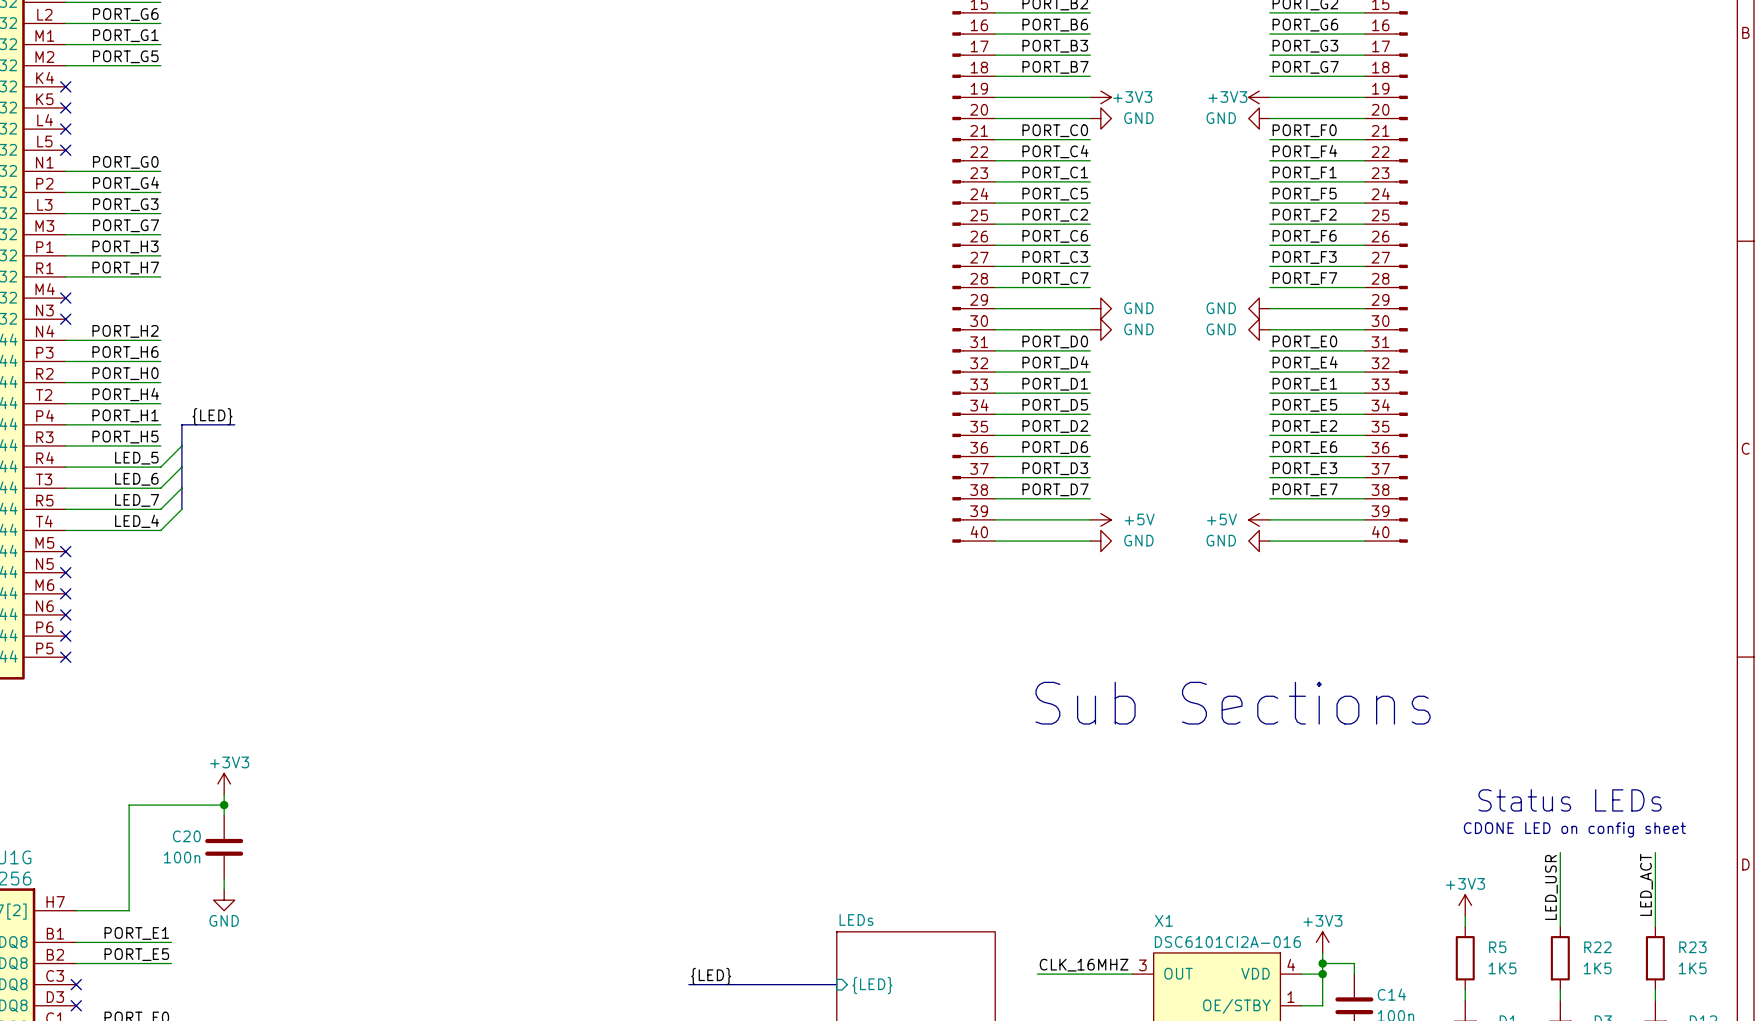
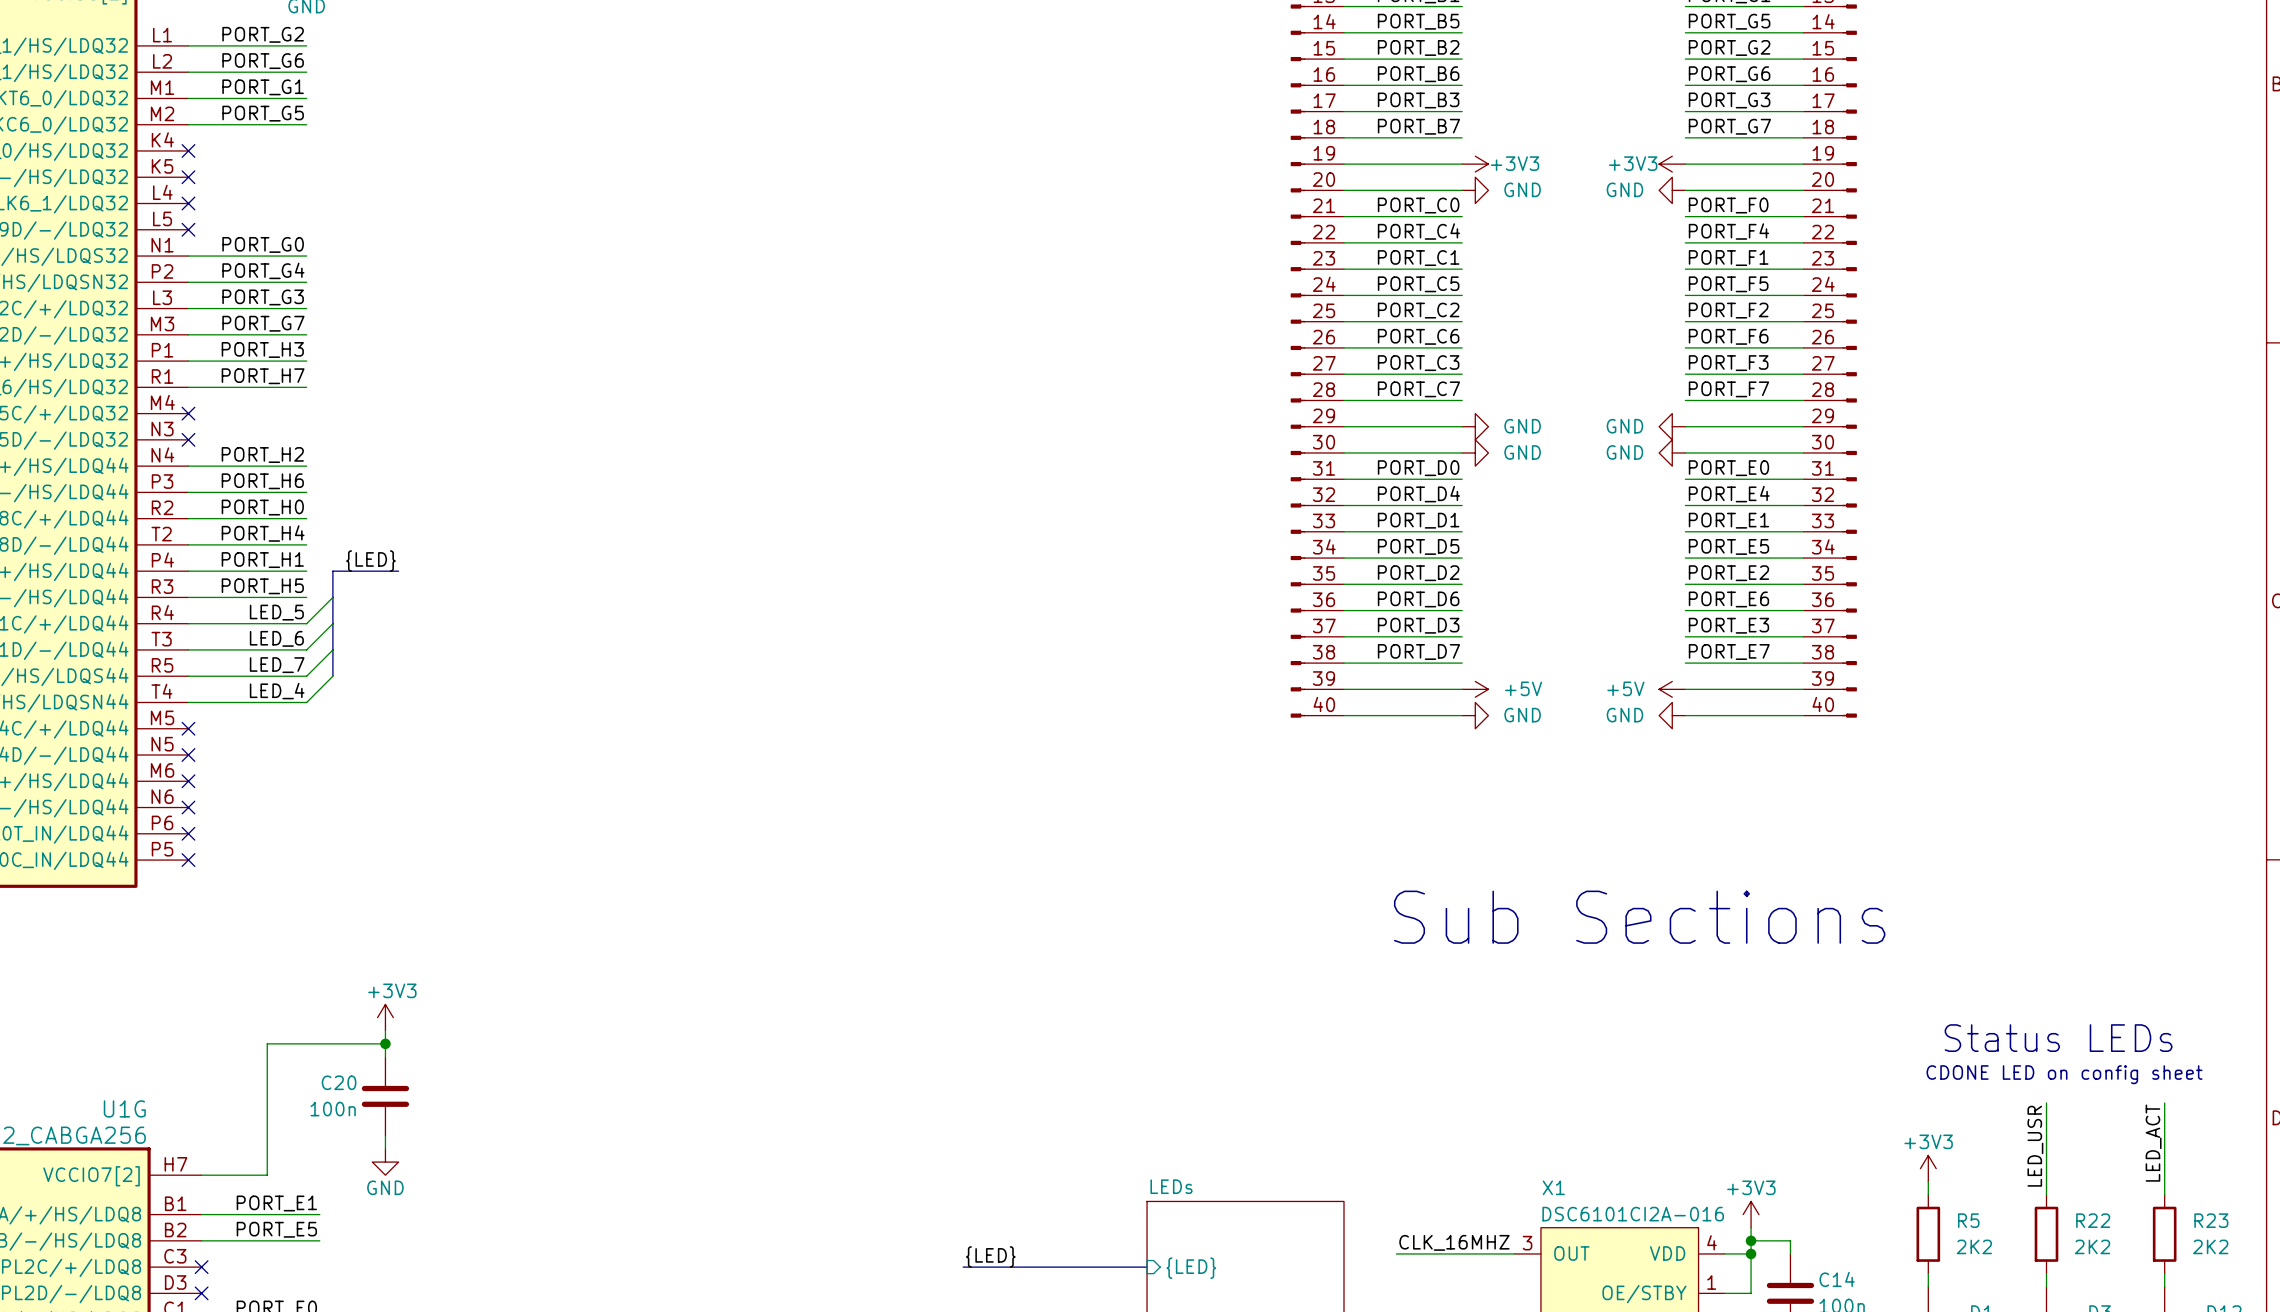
R5 value: 1K5 (1502, 968) -> 2K2 (1974, 1246)
R22 value: 1K5 (1597, 968) -> 2K2 (2092, 1246)
R23 value: 1K5 (1692, 968) -> 2K2 (2210, 1246)

